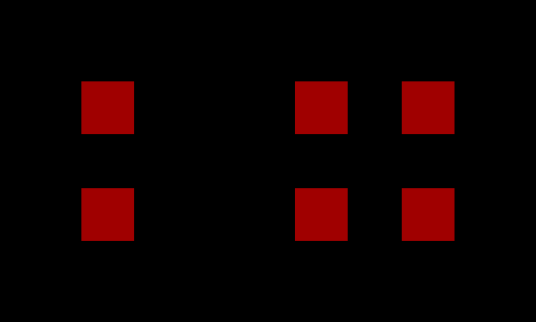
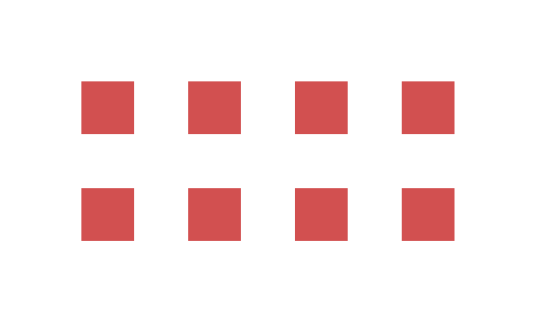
part: none -> (214, 107)
part: none -> (214, 214)

